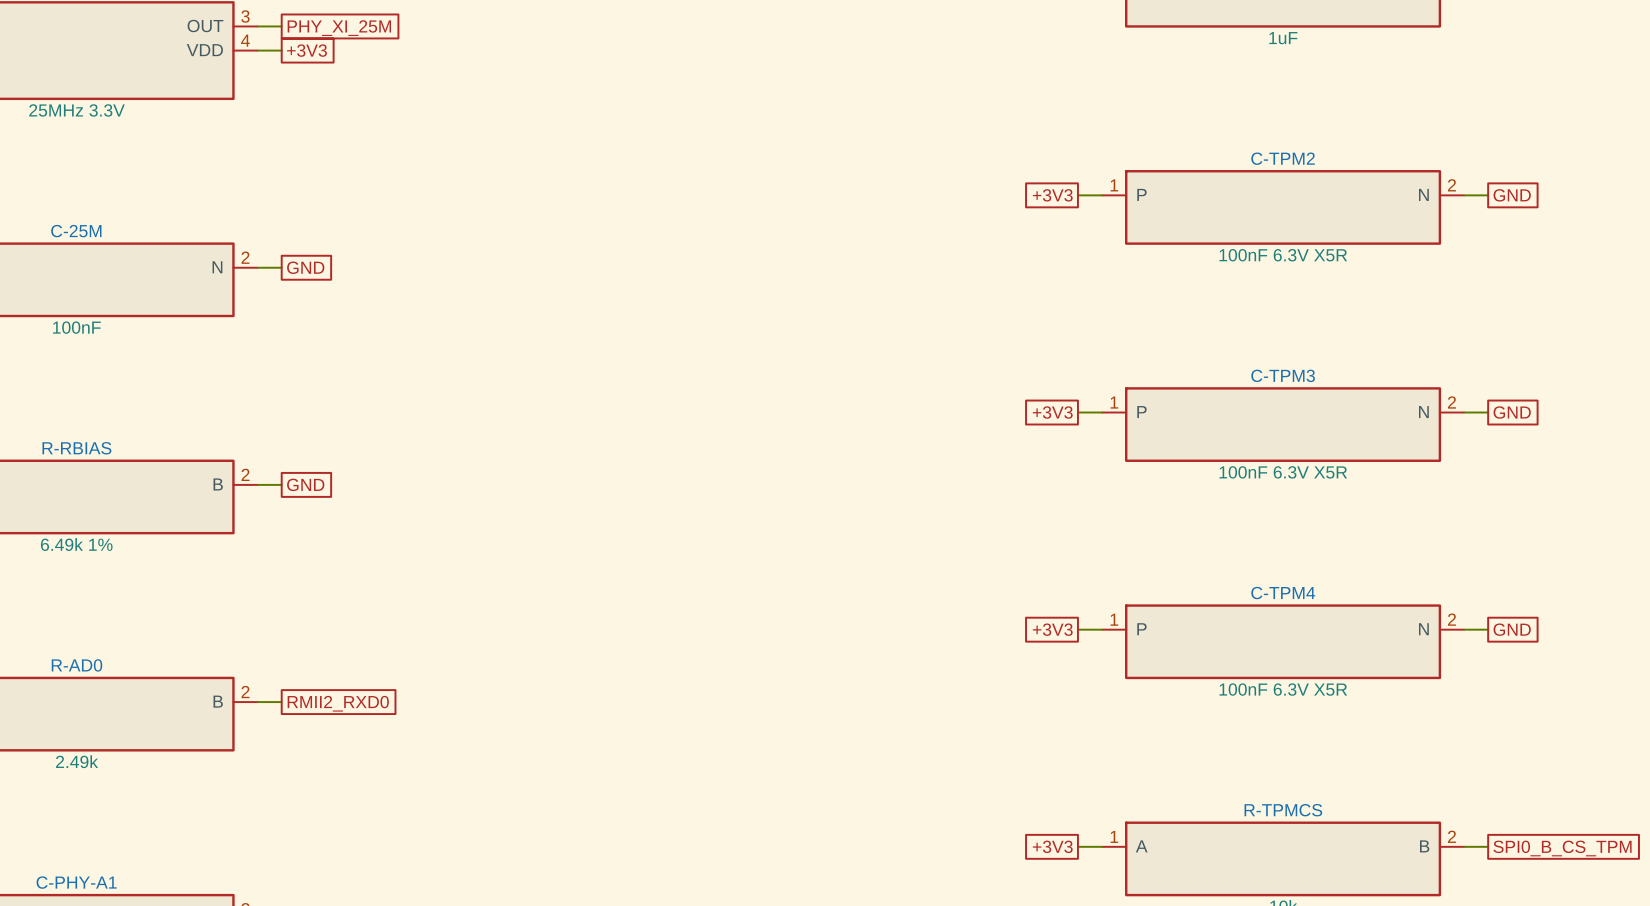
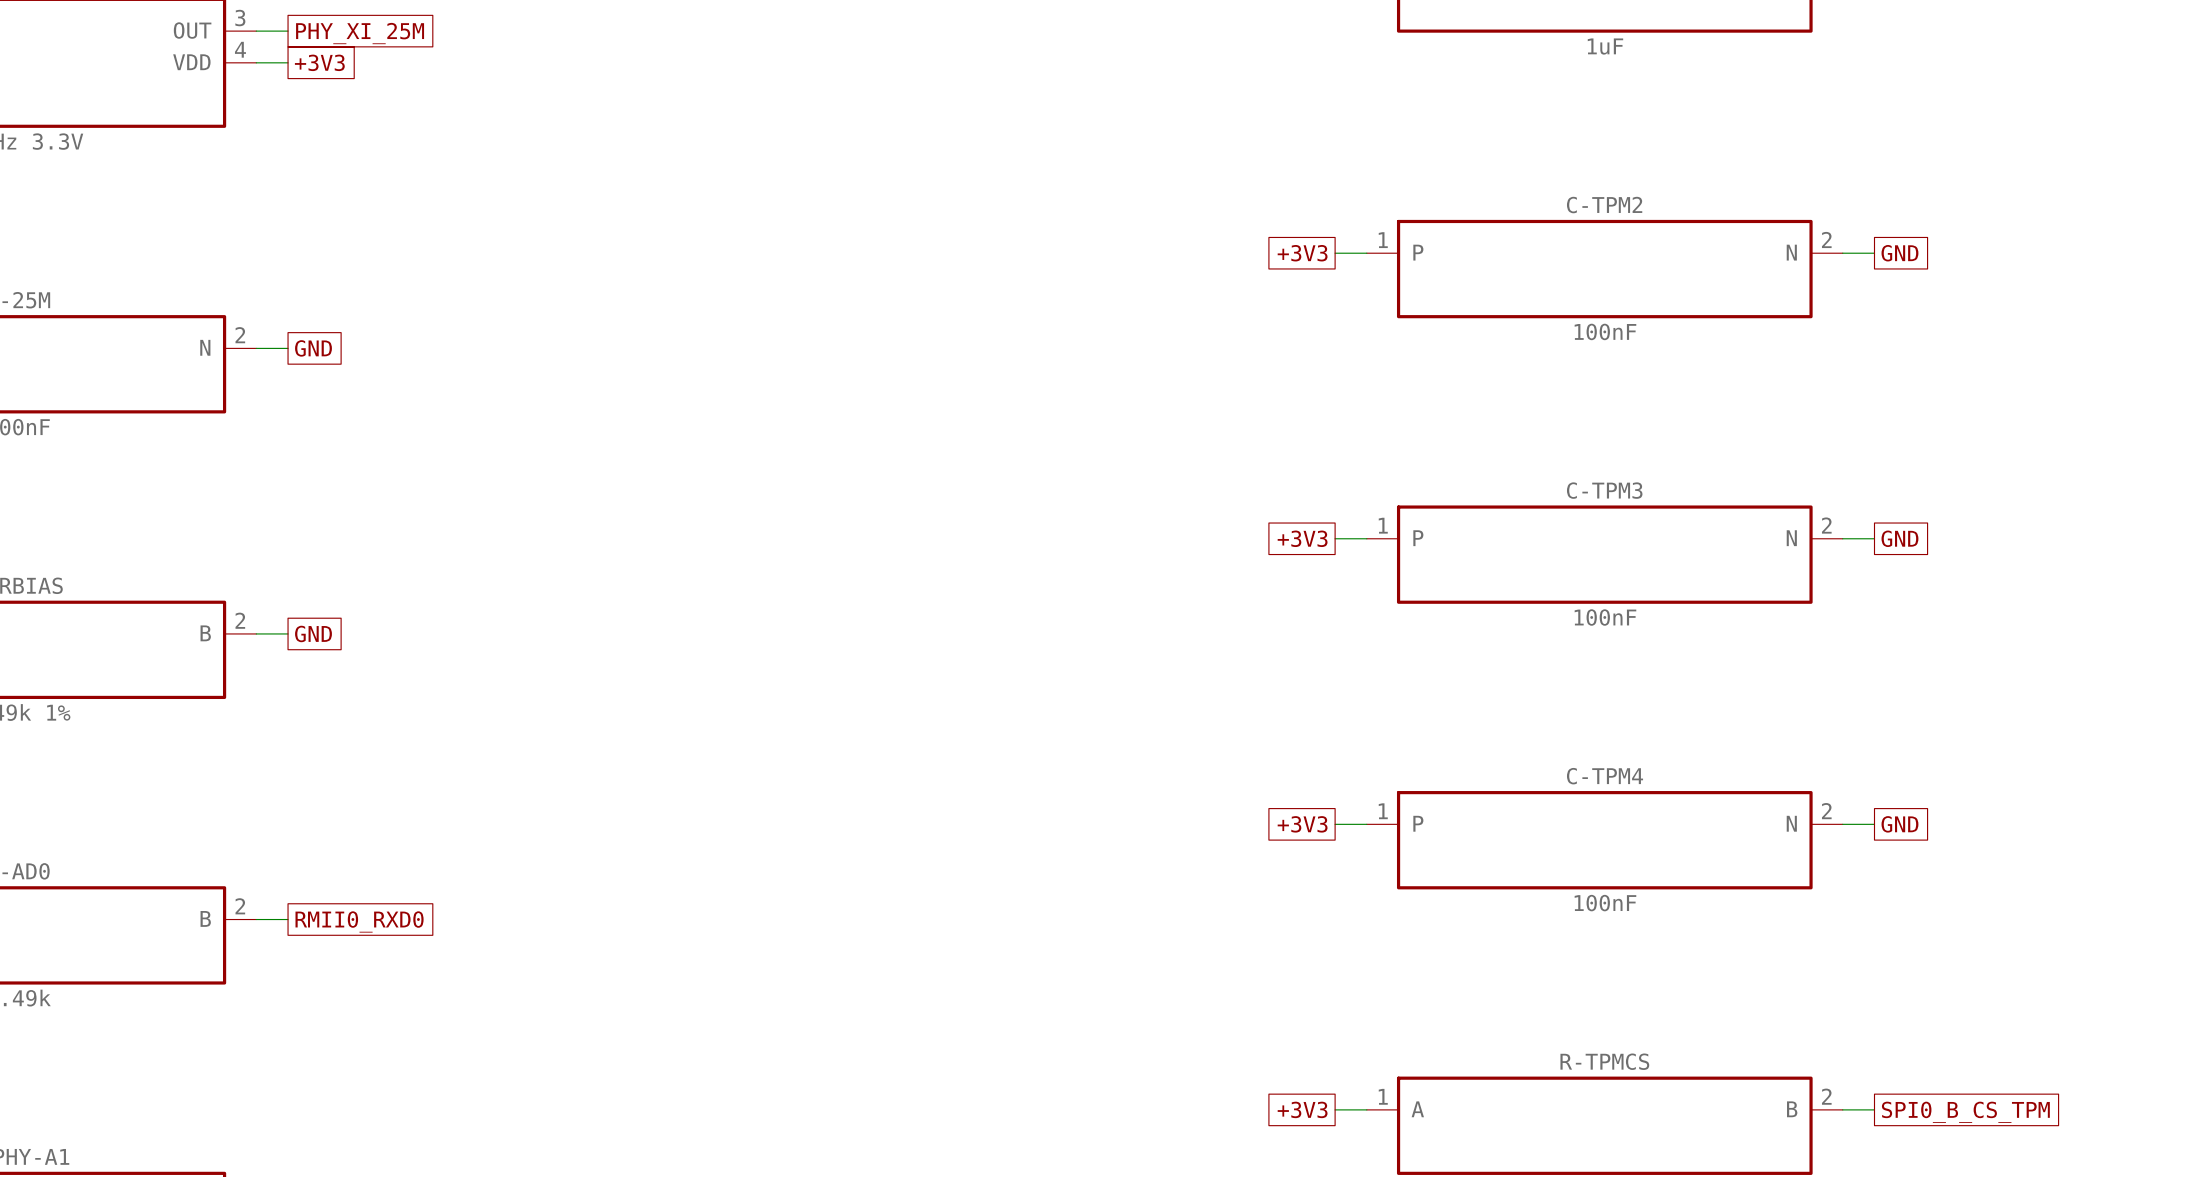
C-TPM2 value: 100nF 6.3V X5R (1283, 255) -> 100nF (1605, 331)
C-TPM3 value: 100nF 6.3V X5R (1283, 472) -> 100nF (1605, 617)
C-TPM4 value: 100nF 6.3V X5R (1283, 689) -> 100nF (1605, 903)
global label: RMII2_RXD0 (338, 703) -> RMII0_RXD0 (359, 921)

